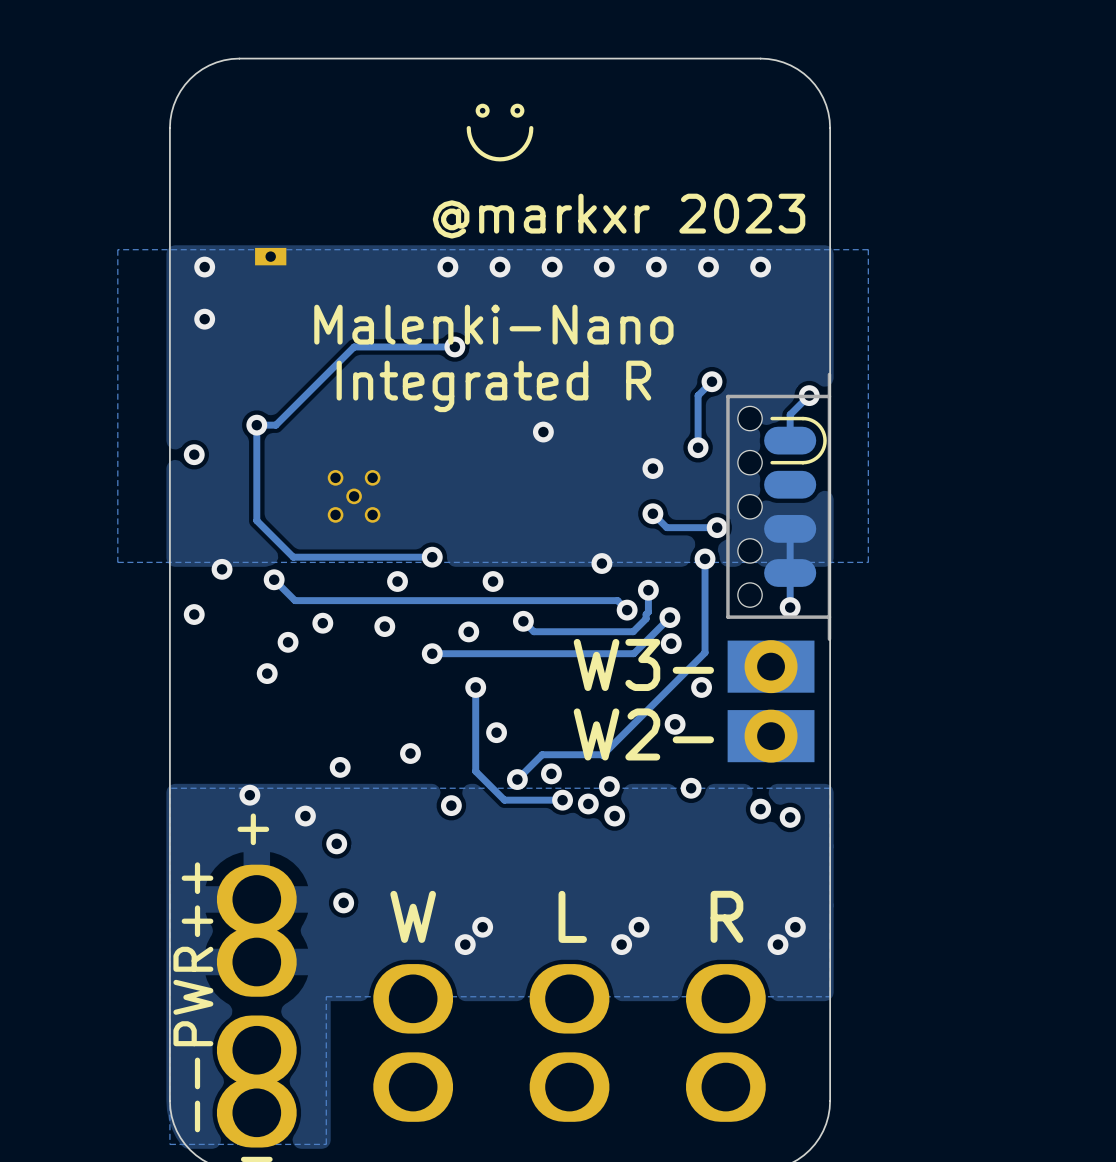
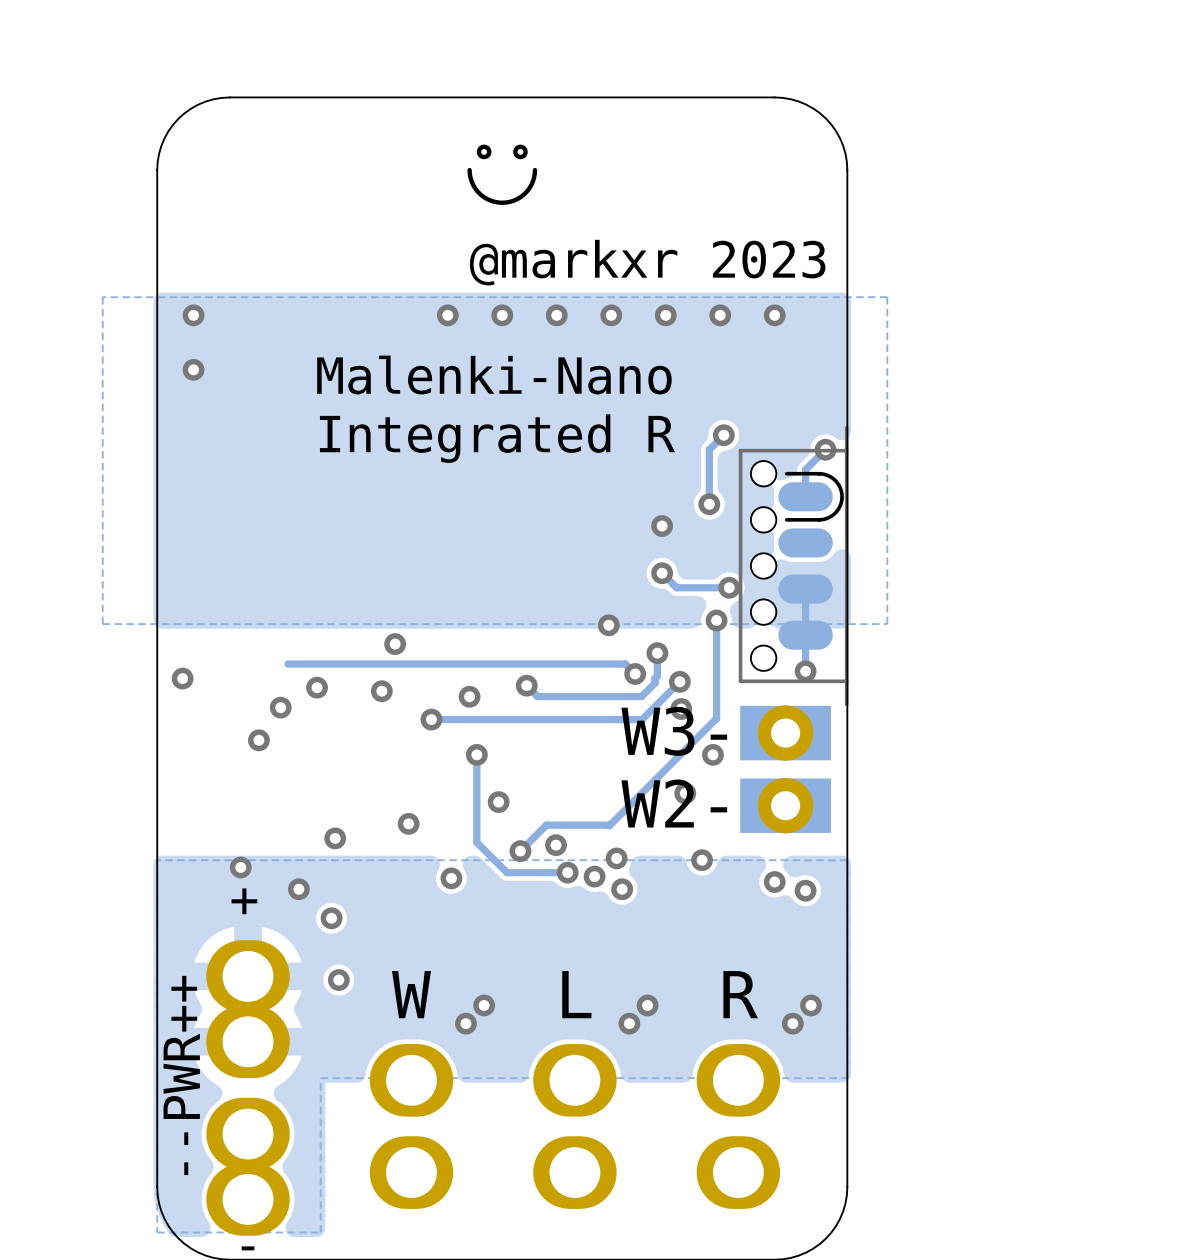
part: (270, 256) -> none
track: (454, 346) (354, 346) (275, 425) (256, 425) (256, 520) (293, 557) (432, 557) -> none
via: (454, 346) -> none
via: (256, 425) -> none
via: (543, 432) -> none
via: (194, 454) -> none
part: (354, 496) -> none
via: (432, 557) -> none
via: (222, 569) -> none
track: (274, 579) (295, 600) -> none
via: (274, 579) -> none
via: (493, 581) -> none

